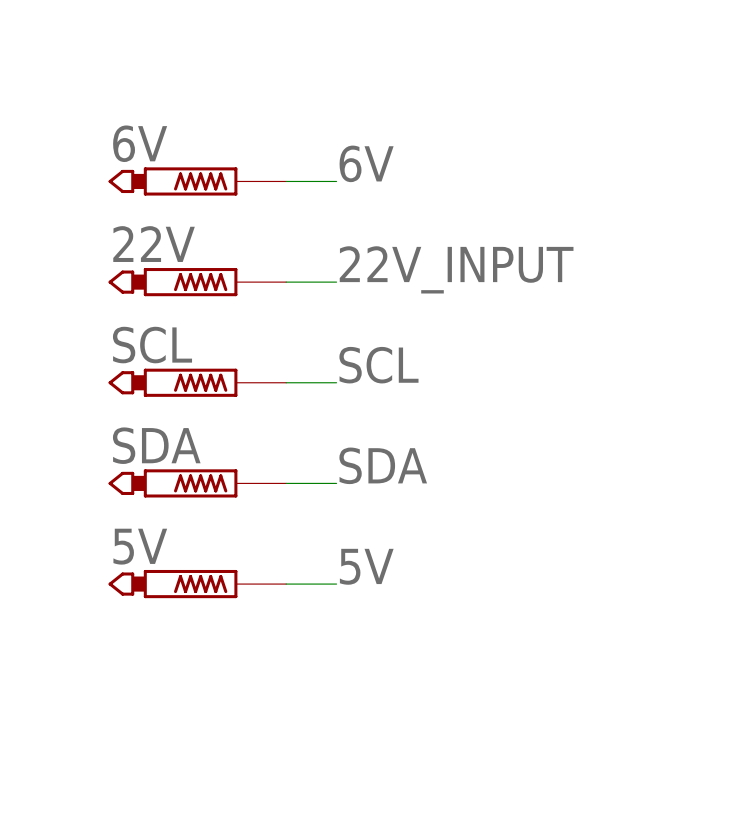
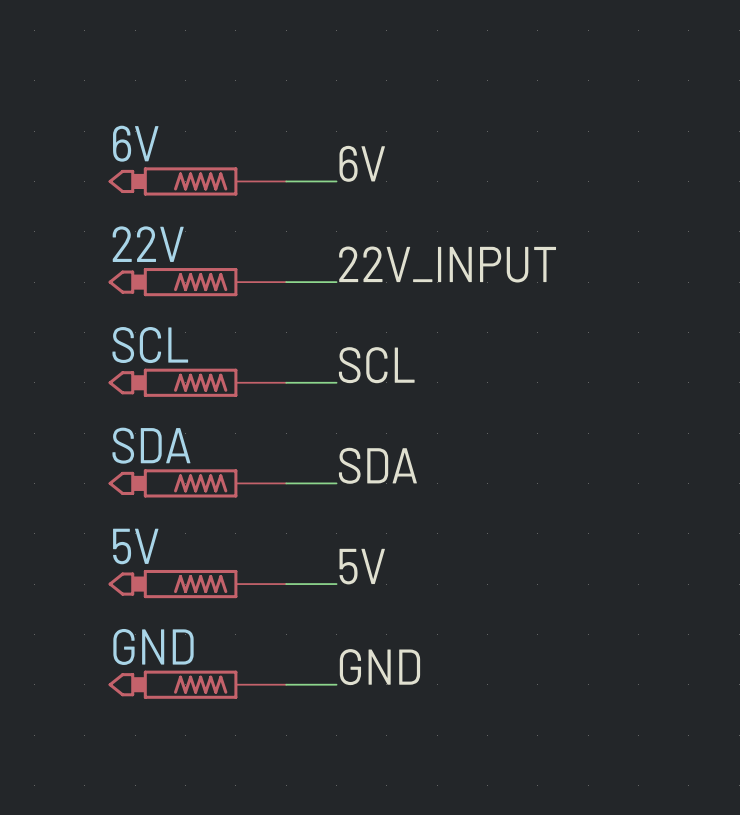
label: none -> GND (379, 667)
GND: none -> (197, 684)
wire: none -> (286, 684) (336, 684)

